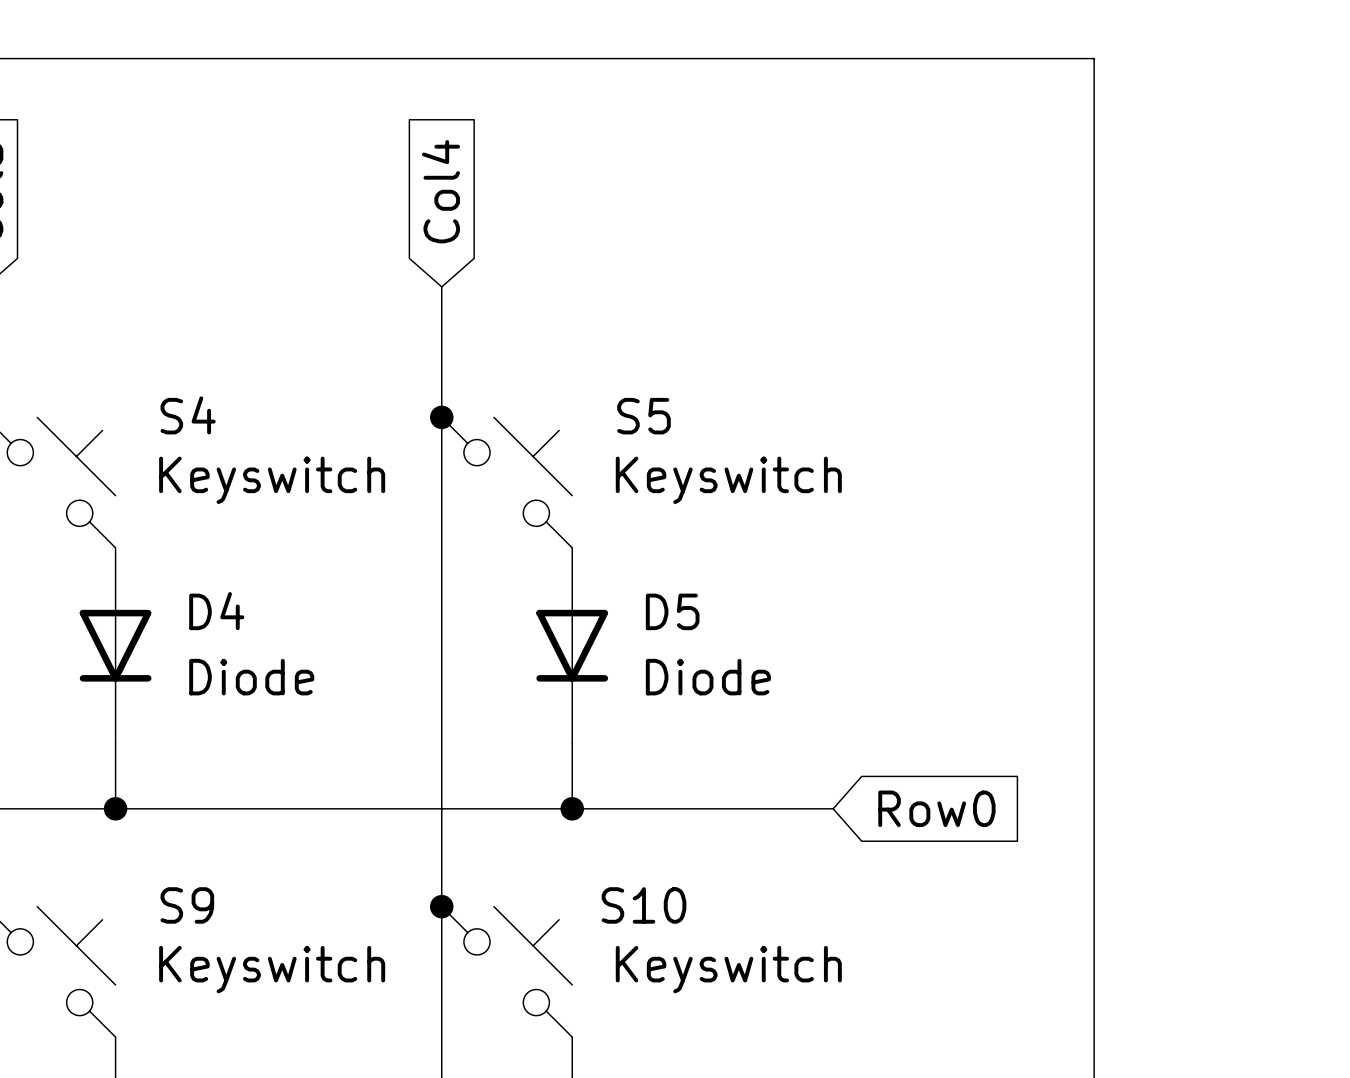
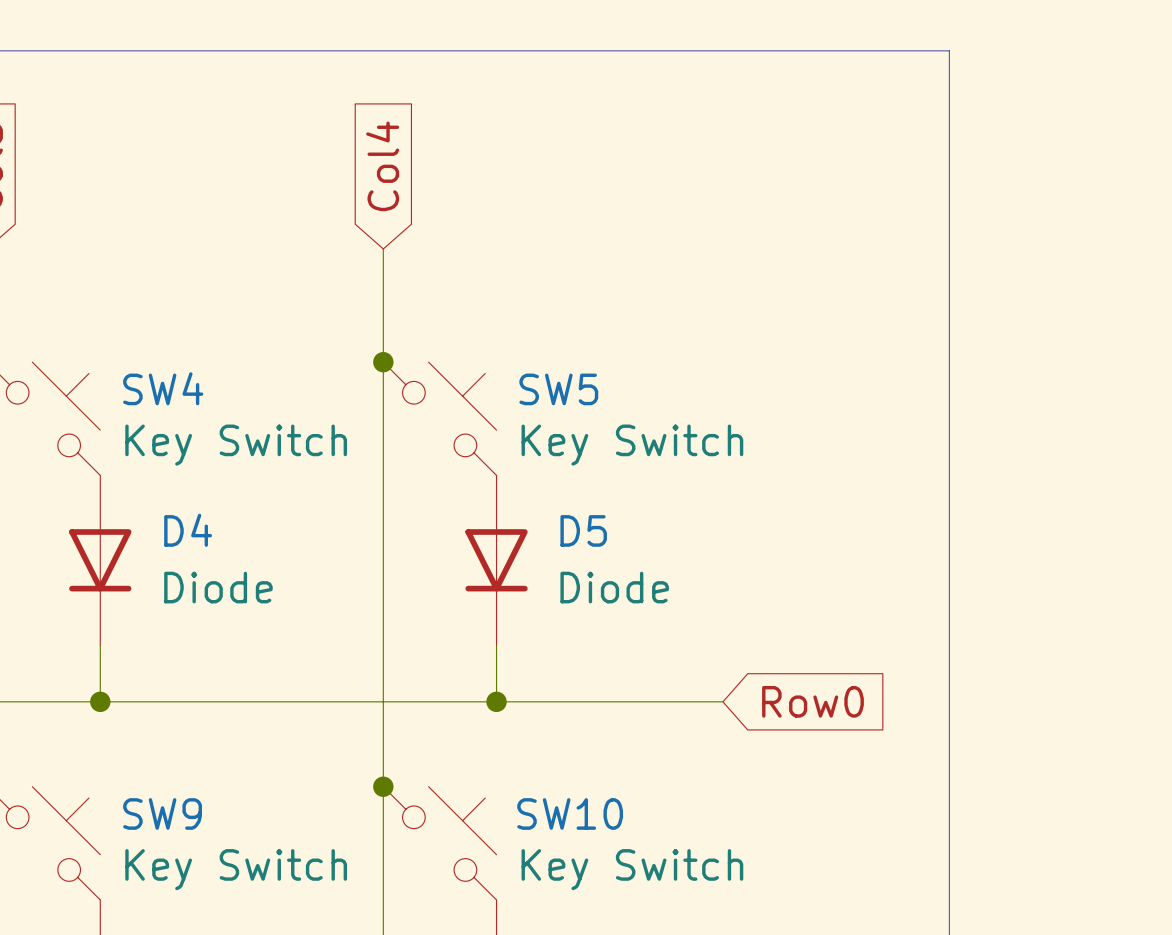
S4 name: S4 (188, 415) -> SW4 (163, 388)
S5 name: S5 (643, 416) -> SW5 (558, 389)
S4 value: Keyswitch (272, 480) -> Key Switch (236, 445)
S5 value: Keyswitch (728, 480) -> Key Switch (632, 445)
S9 name: S9 (187, 905) -> SW9 (162, 813)
S10 name: S10 (643, 905) -> SW10 (570, 813)
S9 value: Keyswitch (272, 969) -> Key Switch (236, 869)
S10 value: Keyswitch (728, 969) -> Key Switch (632, 869)

